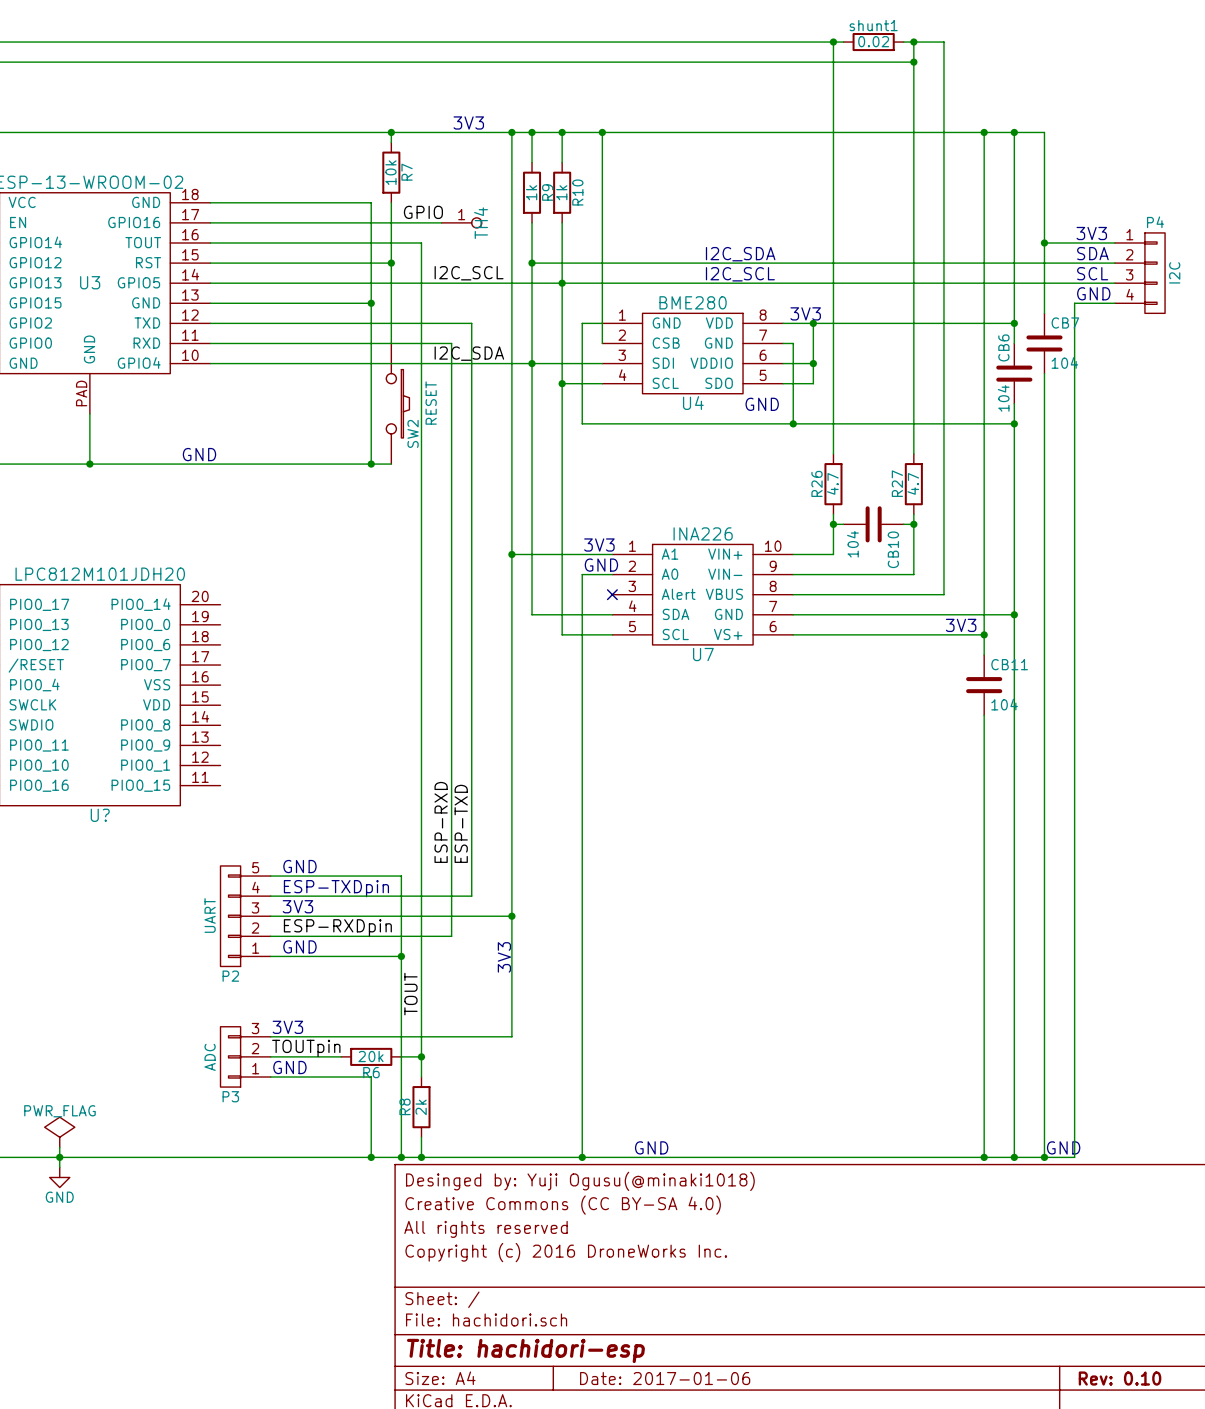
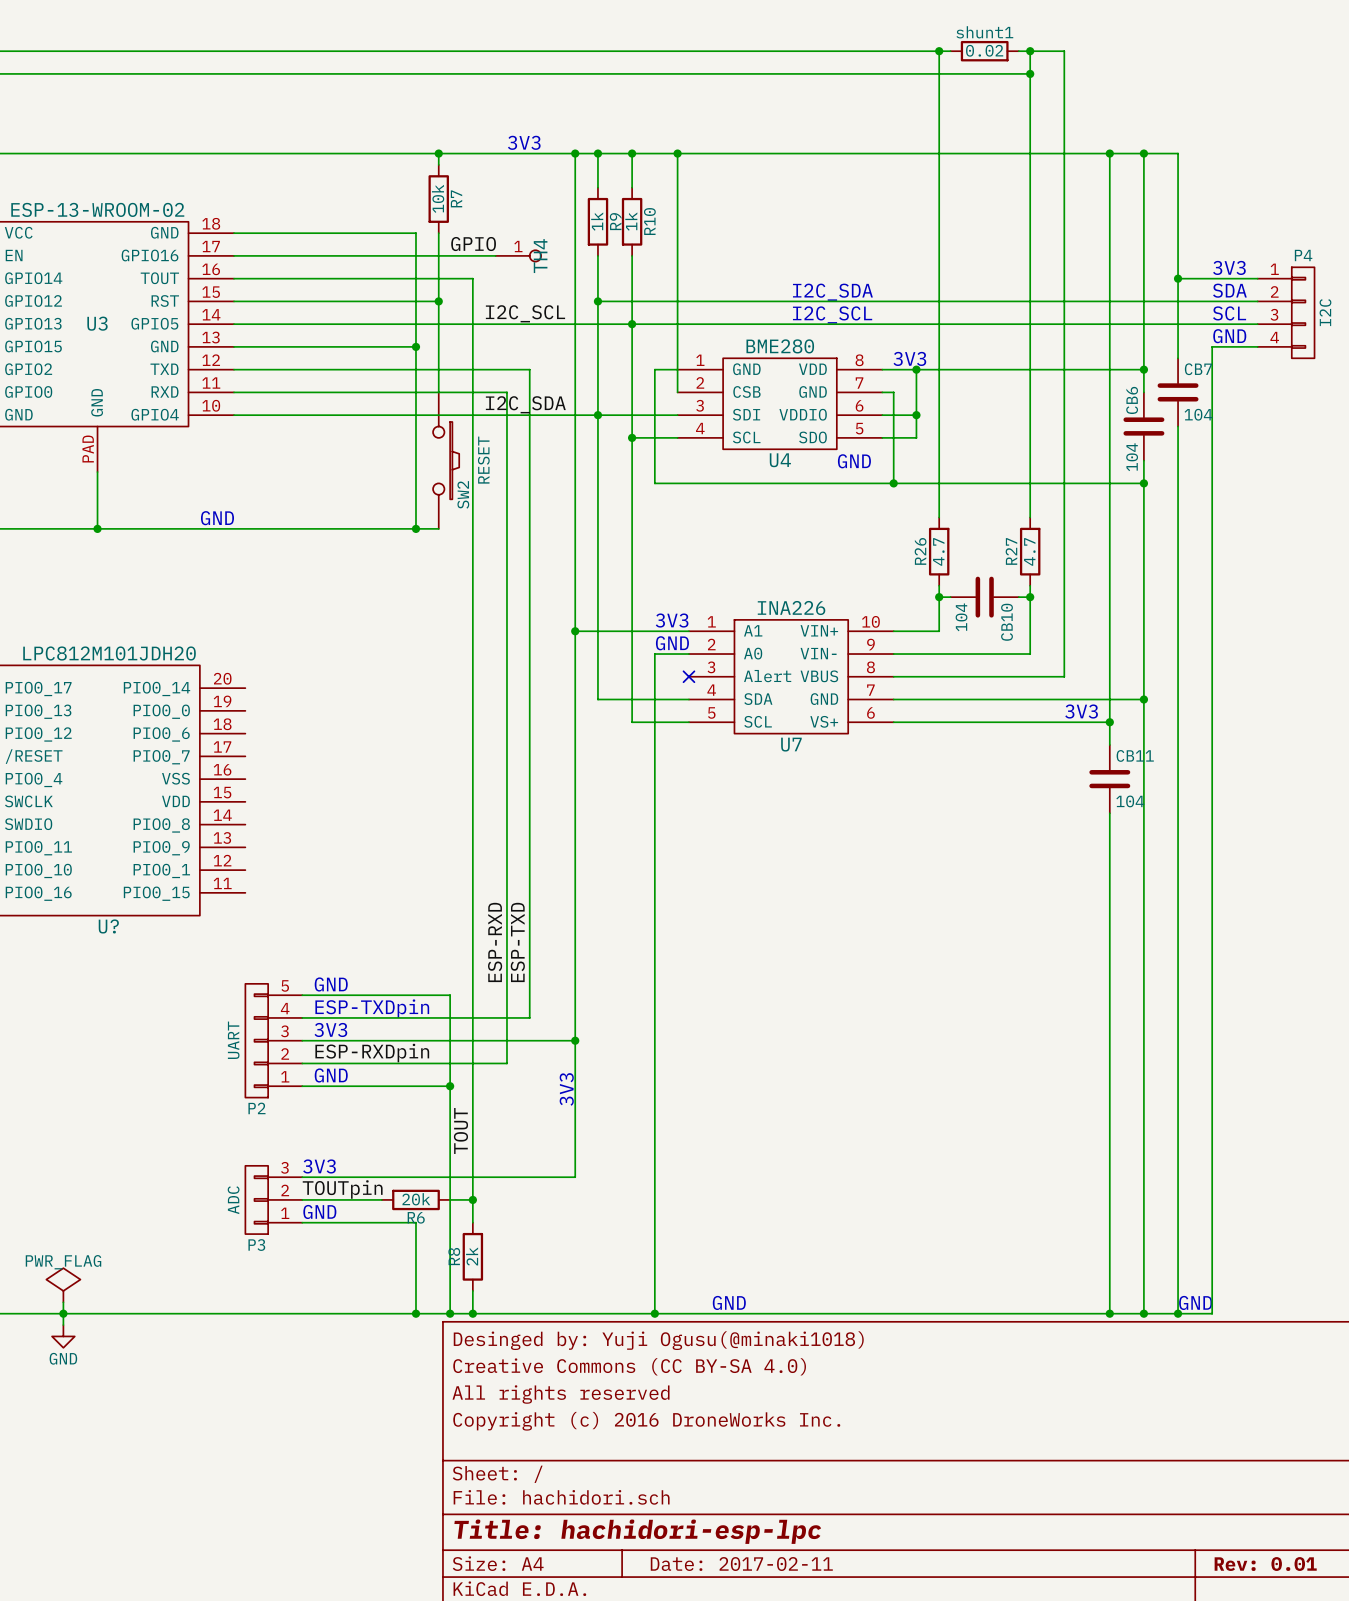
title block: Title: hachidori-esp (525, 1350) -> Title: hachidori-esp-lpc (637, 1531)
title block: Date: 2017-01-06 (665, 1378) -> Date: 2017-02-11 (741, 1564)
title block: Rev: 0.10 (1120, 1378) -> Rev: 0.01 (1265, 1564)

